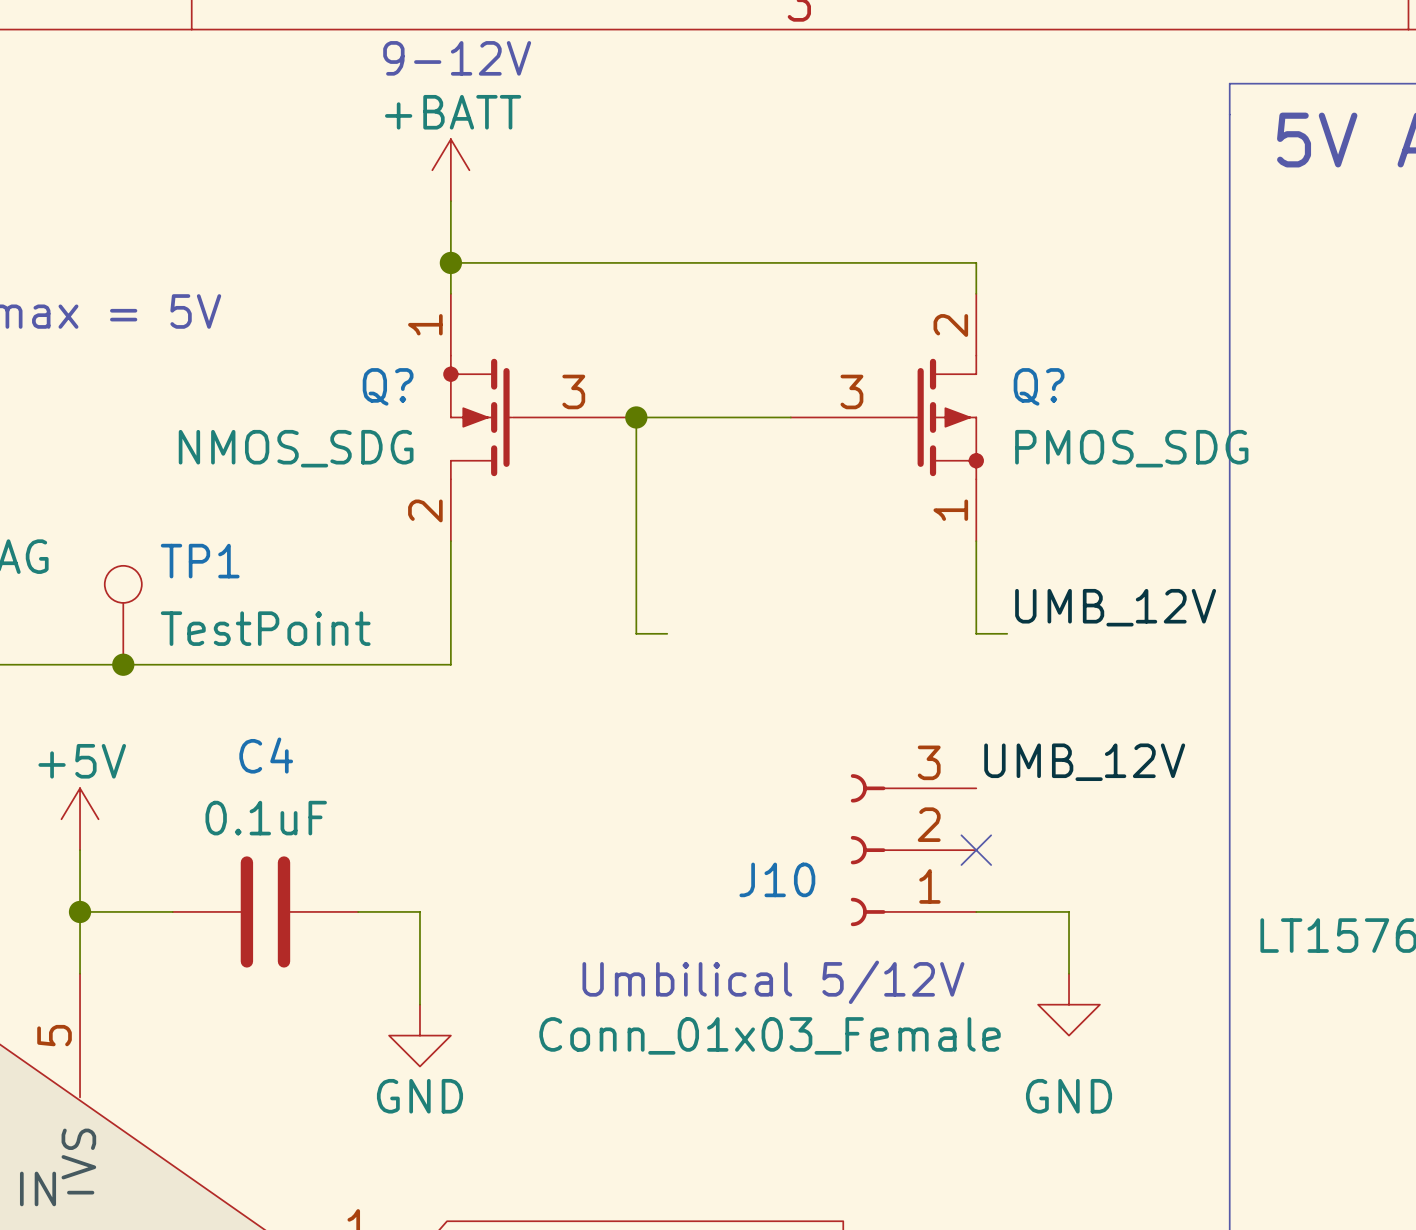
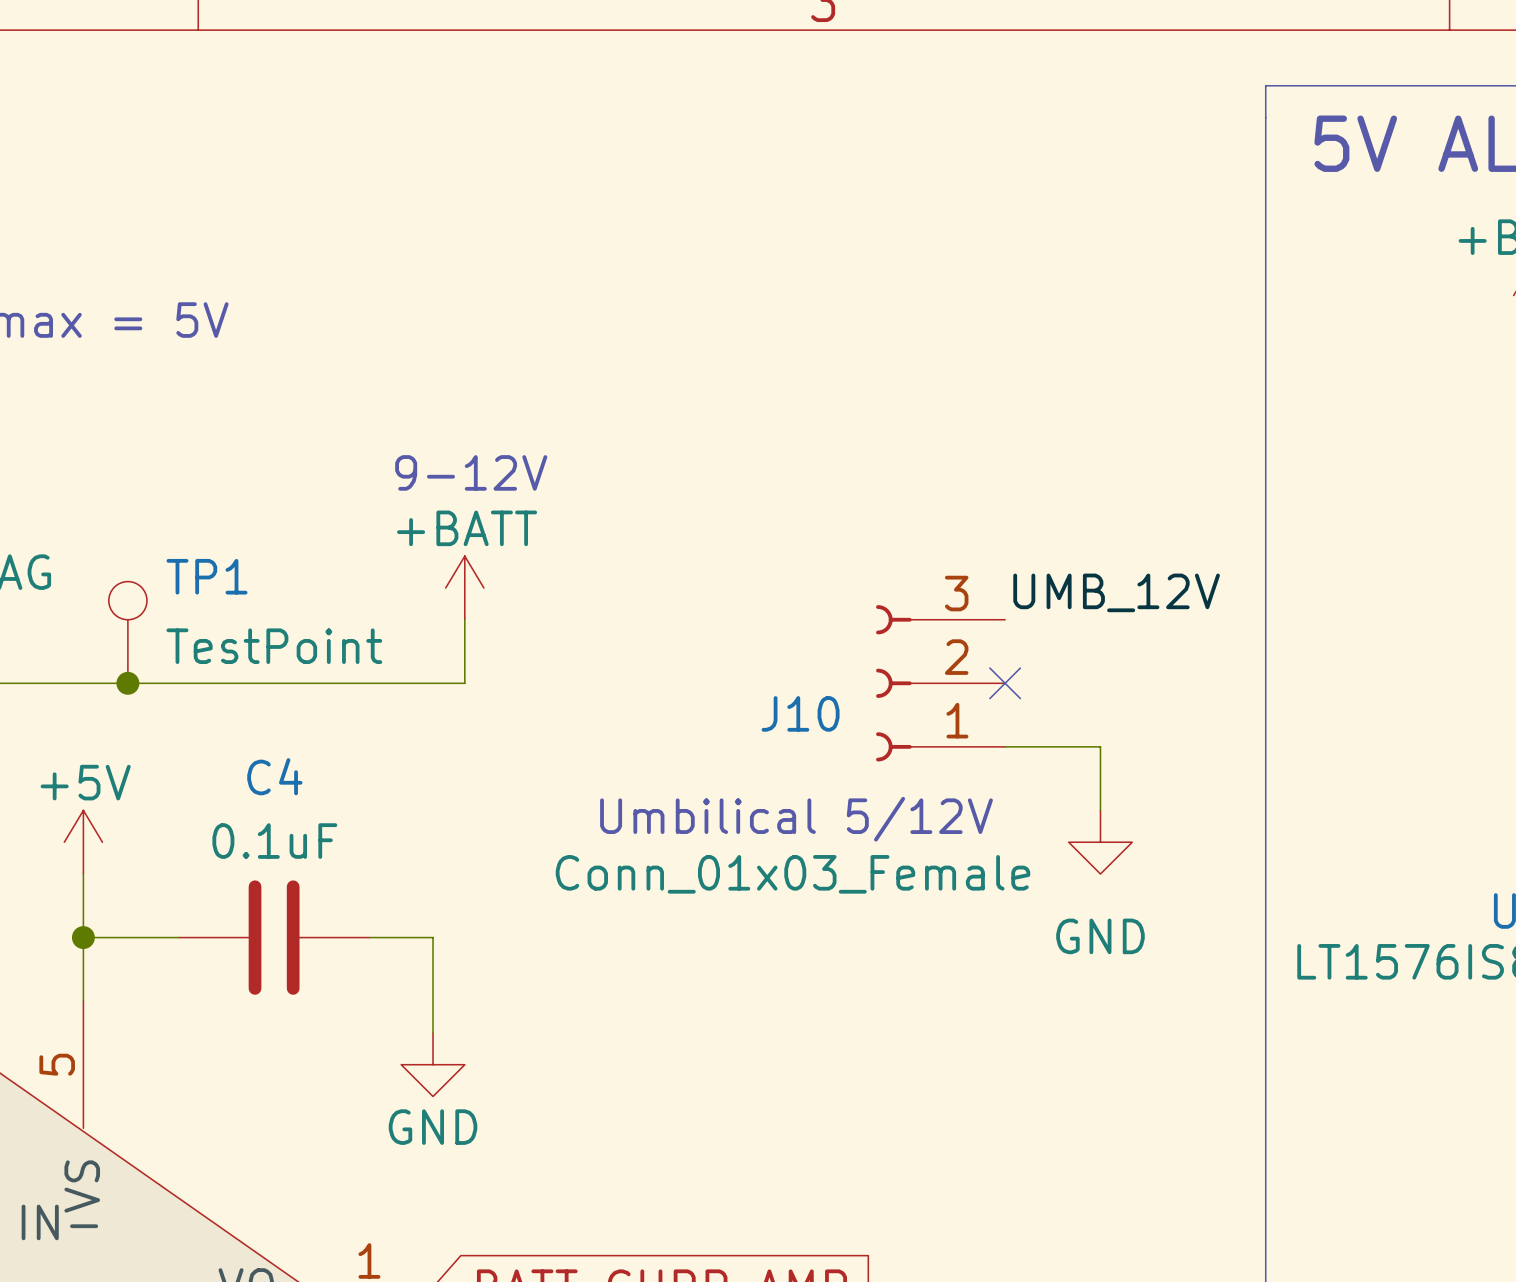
text position: 9-12V (457, 58) -> 9-12V (471, 472)
power symbol position: +BATT (450, 170) -> +BATT (464, 587)
wire: (450, 201) (450, 293) -> none
wire: (450, 262) (976, 262) (976, 293) -> none
junction: (450, 262) -> none
Q?: NMOS_SDG (540, 417) -> none
junction: (636, 417) -> none
wire: (790, 417) (636, 417) (636, 633) (667, 633) -> none
Q?: PMOS_SDG (886, 417) -> none
wire: (976, 541) (976, 633) (1007, 633) -> none
label position: UMB_12V (1115, 607) -> UMB_12V (1116, 592)
no-connect mark: none -> (1005, 683)
label: UMB_12V (1084, 762) -> none
J10 position: (913, 850) -> (940, 683)
no-connect mark: (976, 850) -> none
wire: (976, 911) (1069, 911) (1069, 973) -> (1005, 746) (1100, 746) (1100, 810)
text position: Umbilical 5/12V (773, 982) -> Umbilical 5/12V (796, 819)
power symbol position: GND (1069, 1004) -> GND (1100, 842)

